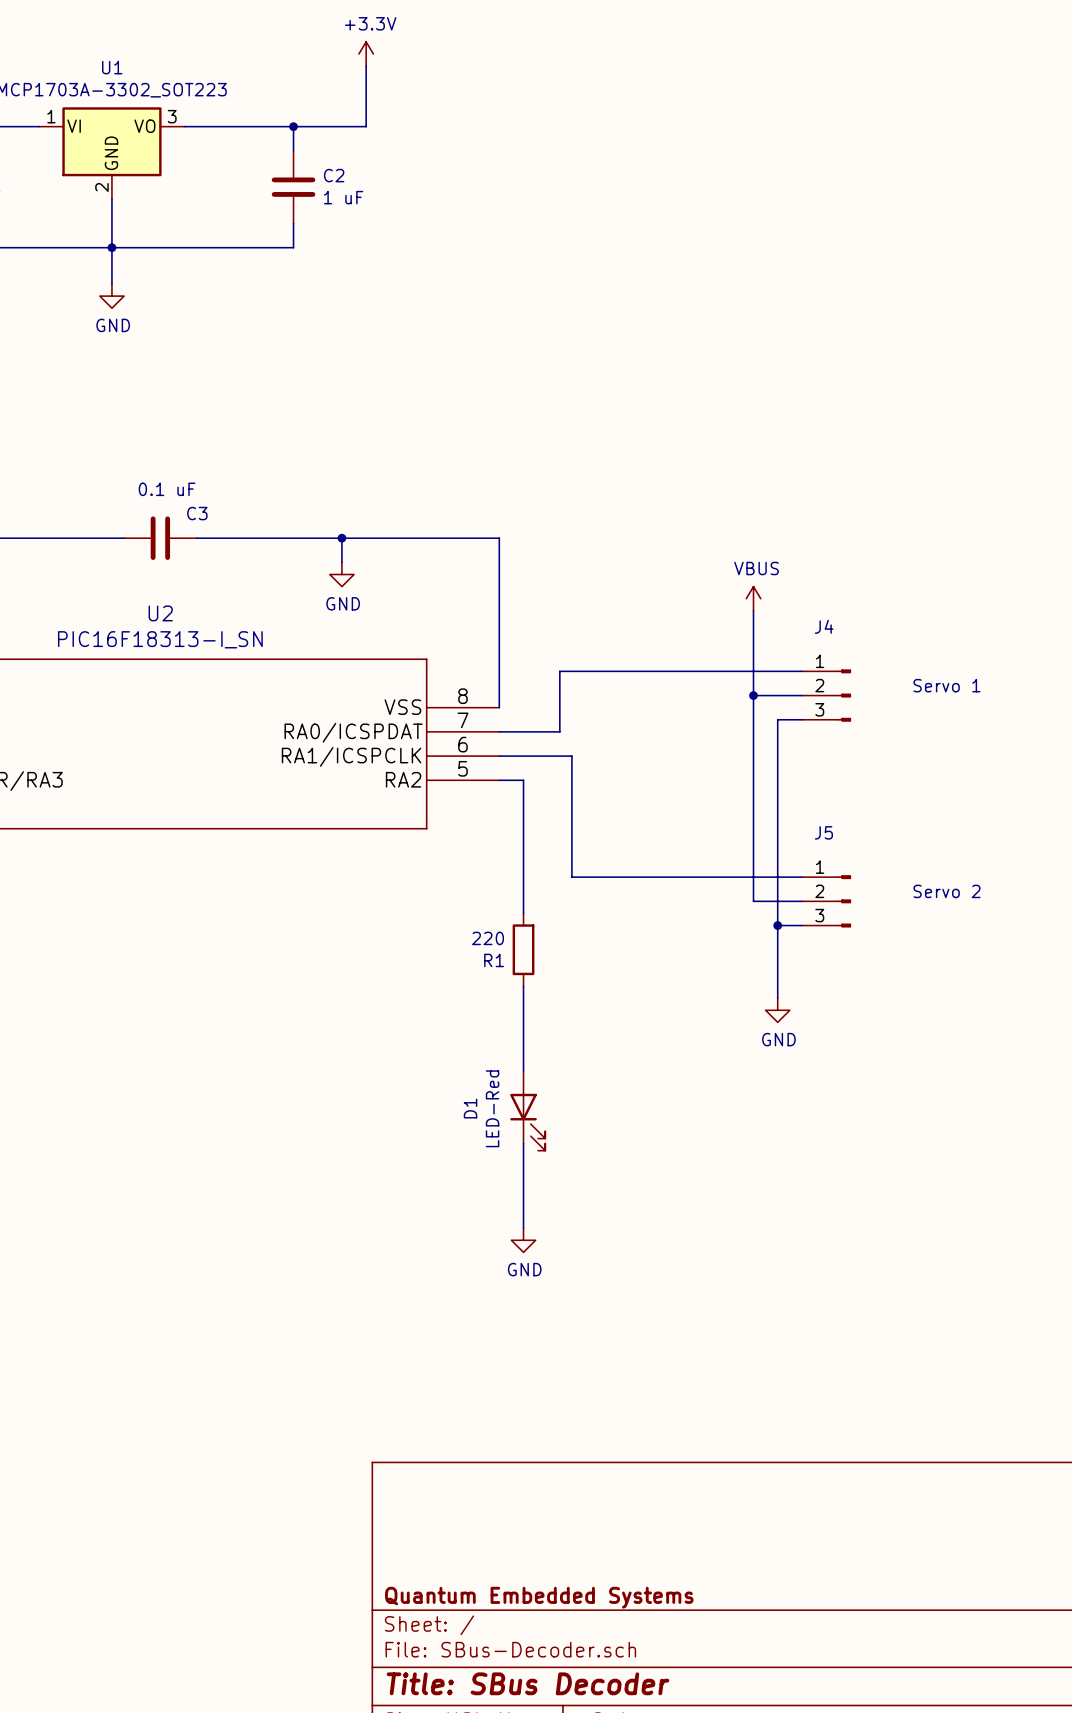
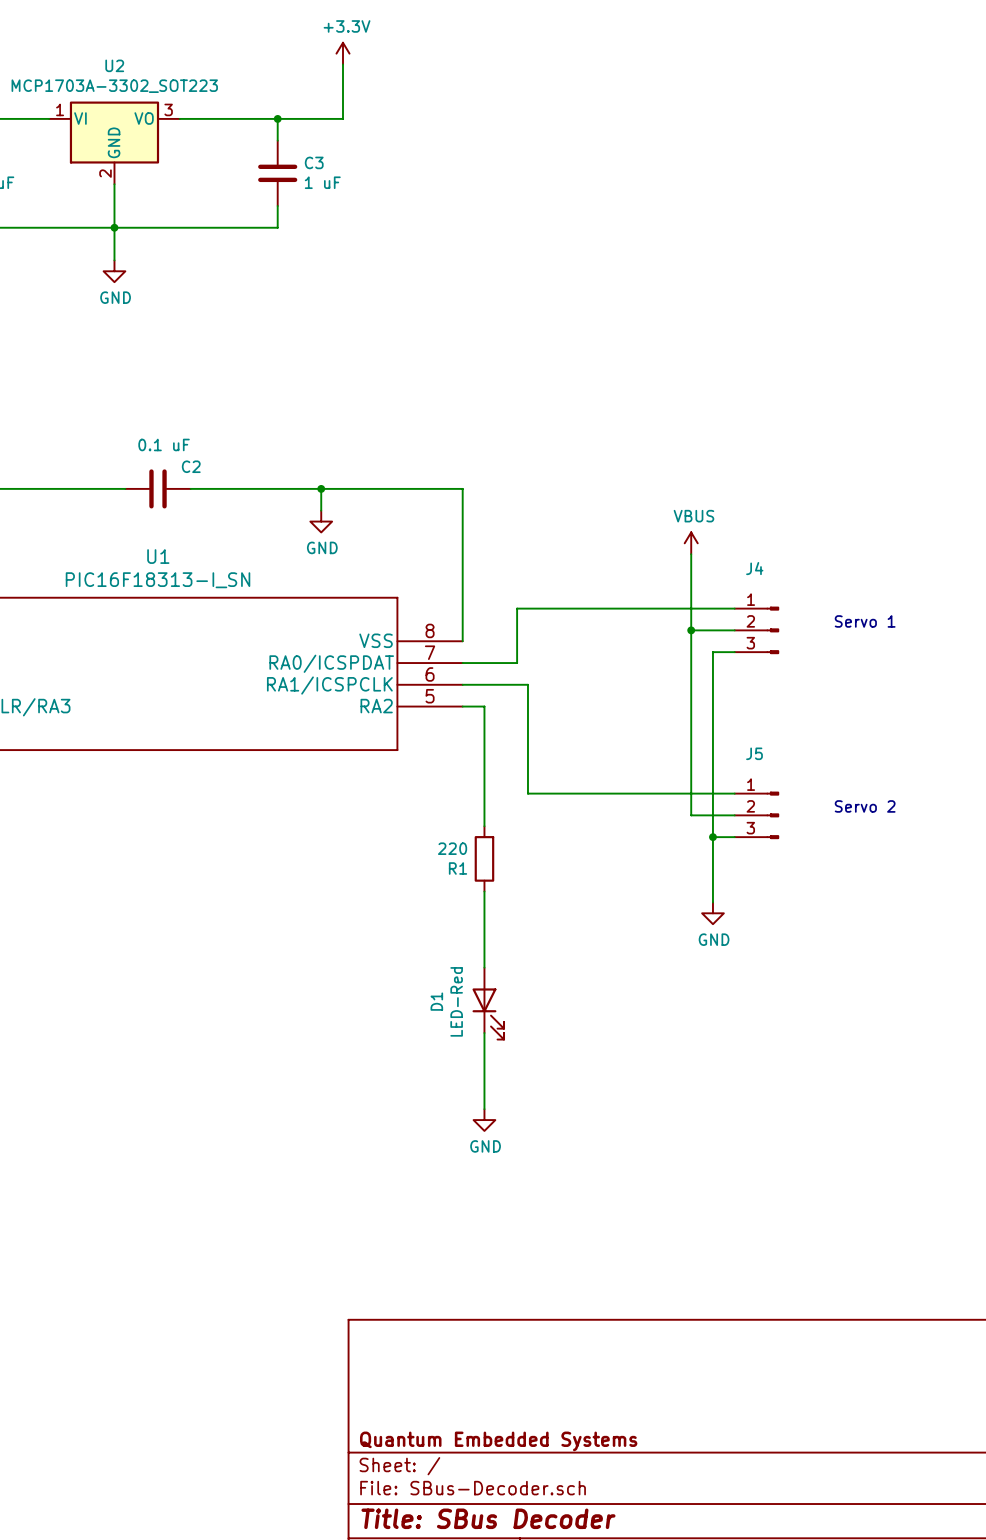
U1 name: U1 (112, 67) -> U2 (114, 65)
C2 name: C2 (334, 175) -> C3 (314, 162)
C3 name: C3 (197, 513) -> C2 (191, 466)
U2 name: U2 (160, 613) -> U1 (158, 556)

